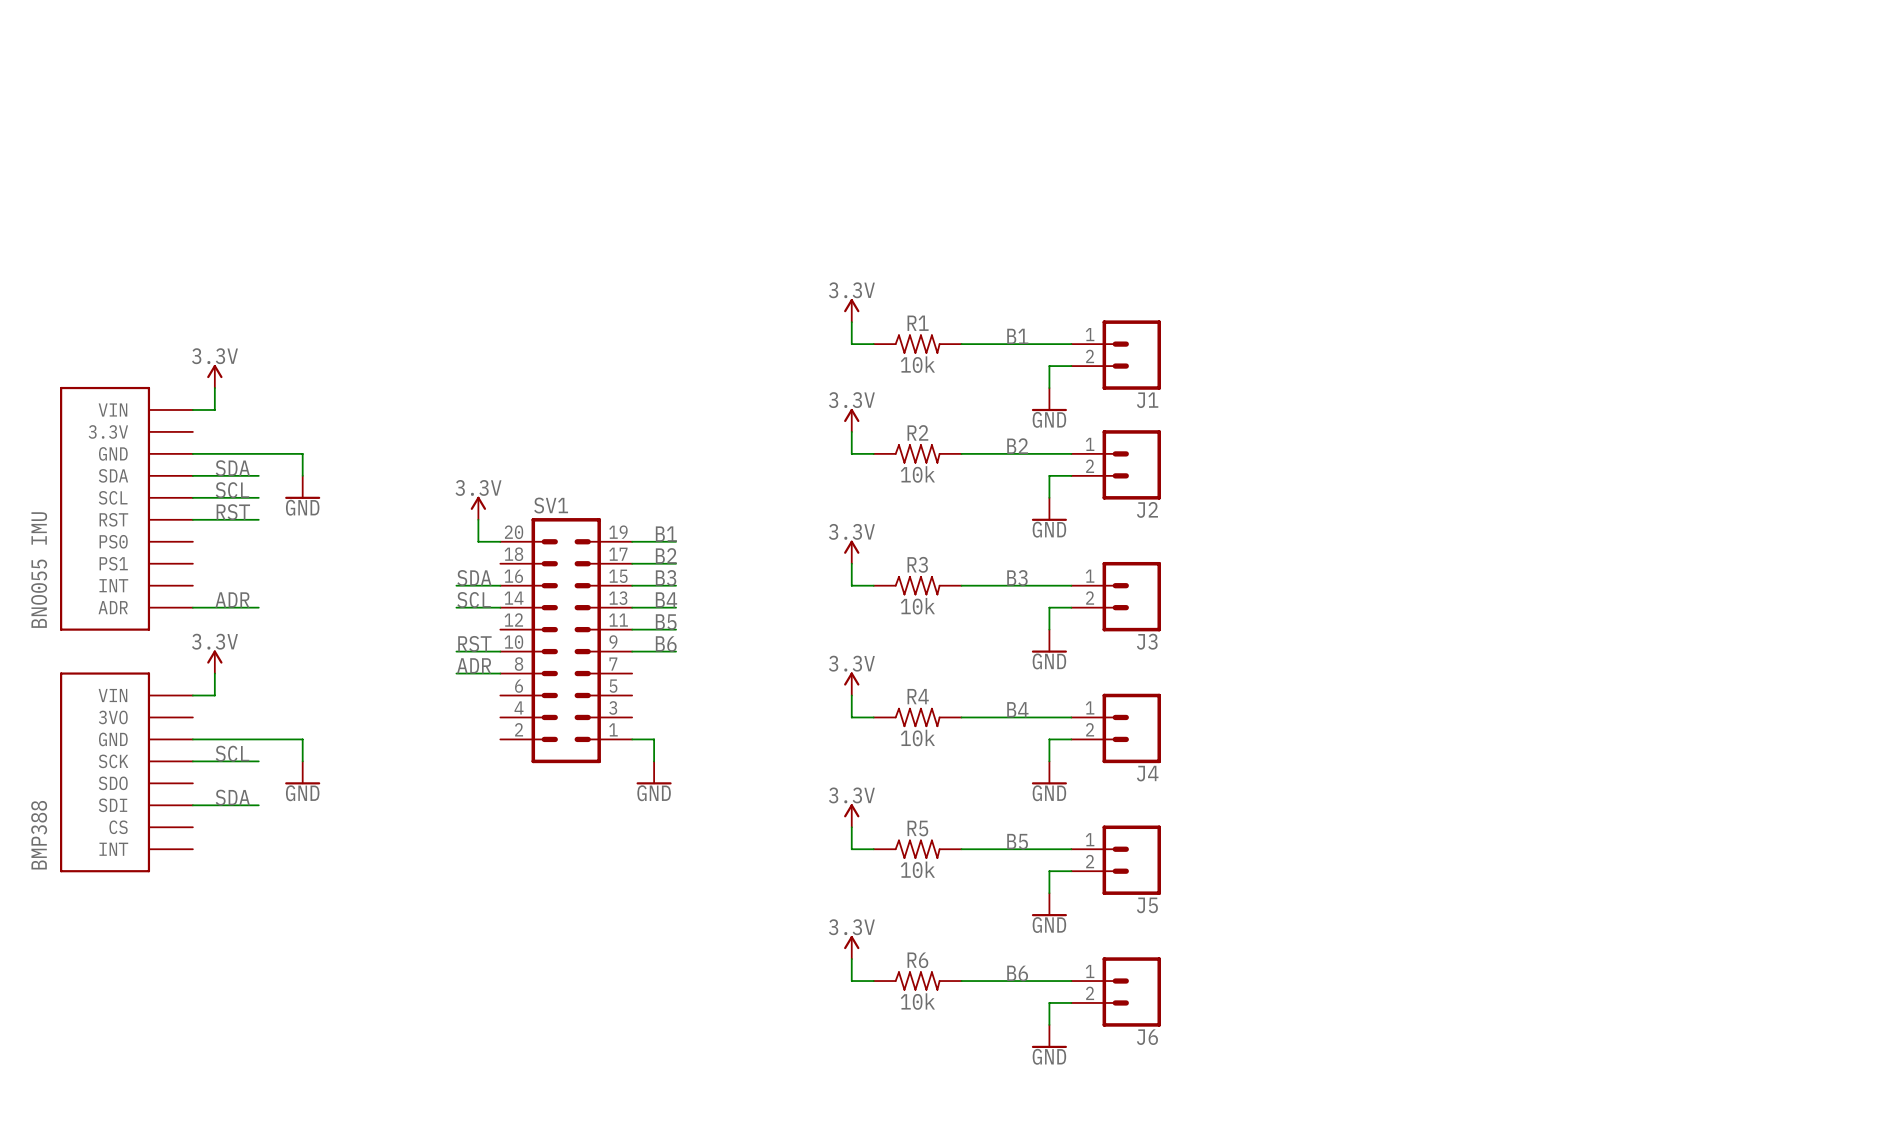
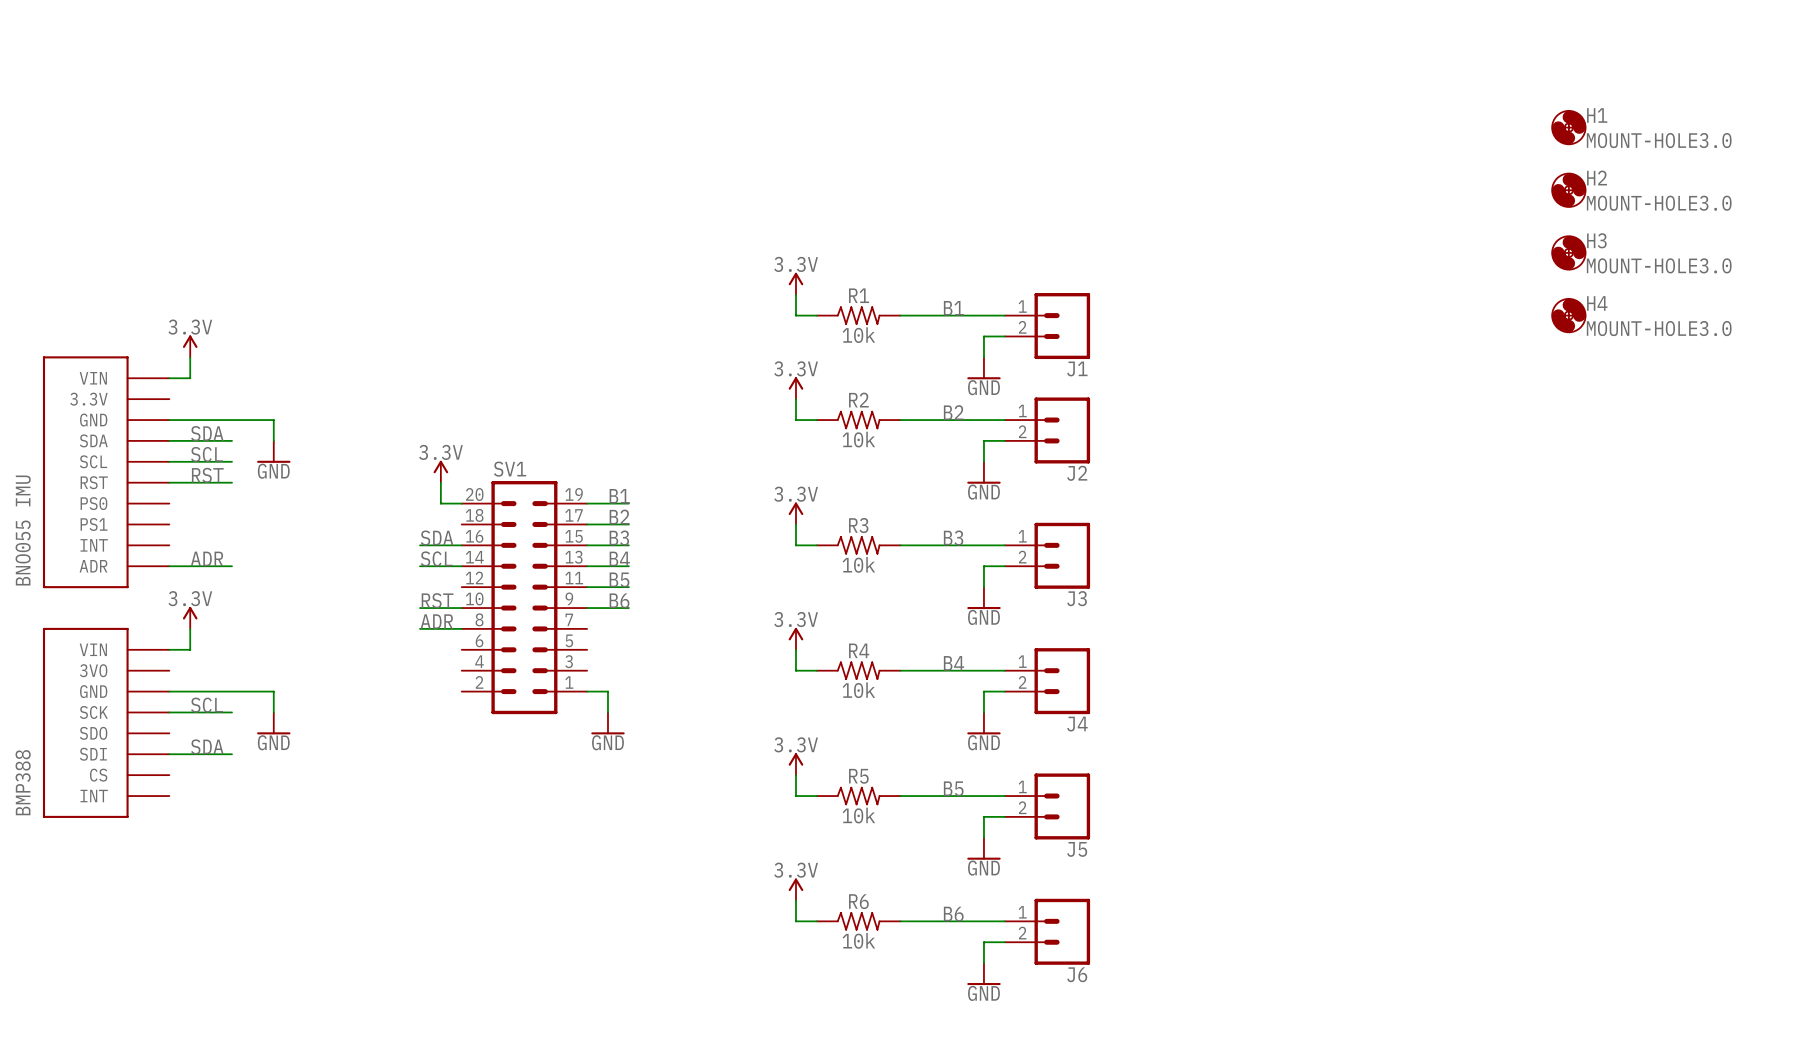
H1: none -> MOUNT-HOLE3.0 (1568, 127)
H2: none -> MOUNT-HOLE3.0 (1568, 190)
H3: none -> MOUNT-HOLE3.0 (1568, 252)
H4: none -> MOUNT-HOLE3.0 (1568, 315)

